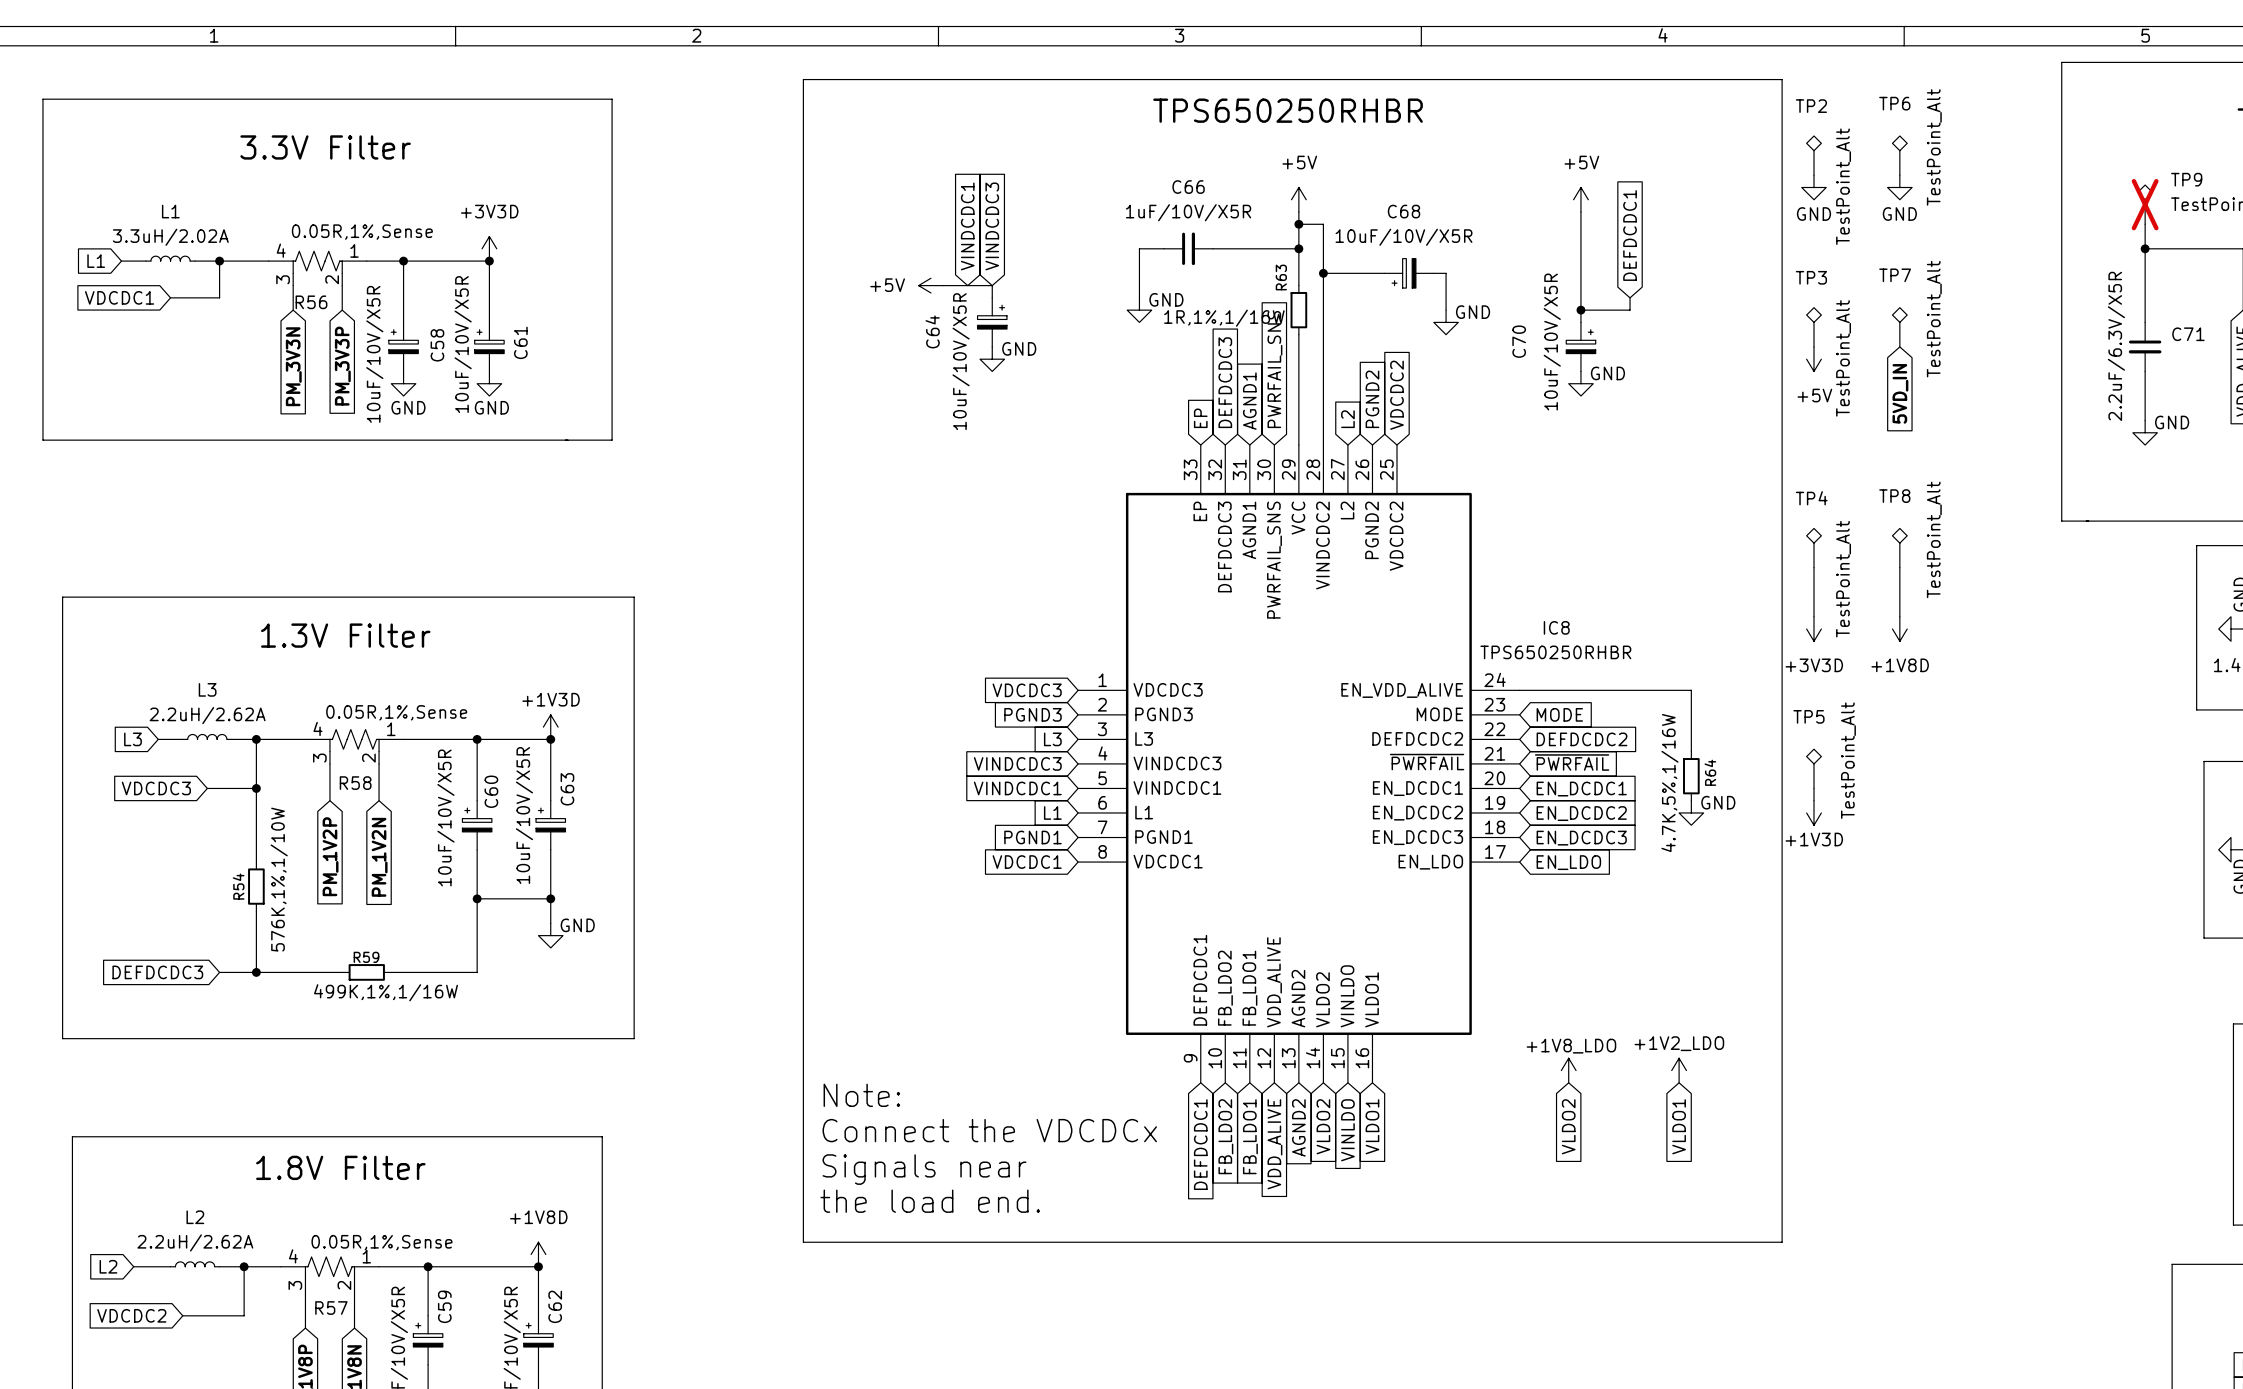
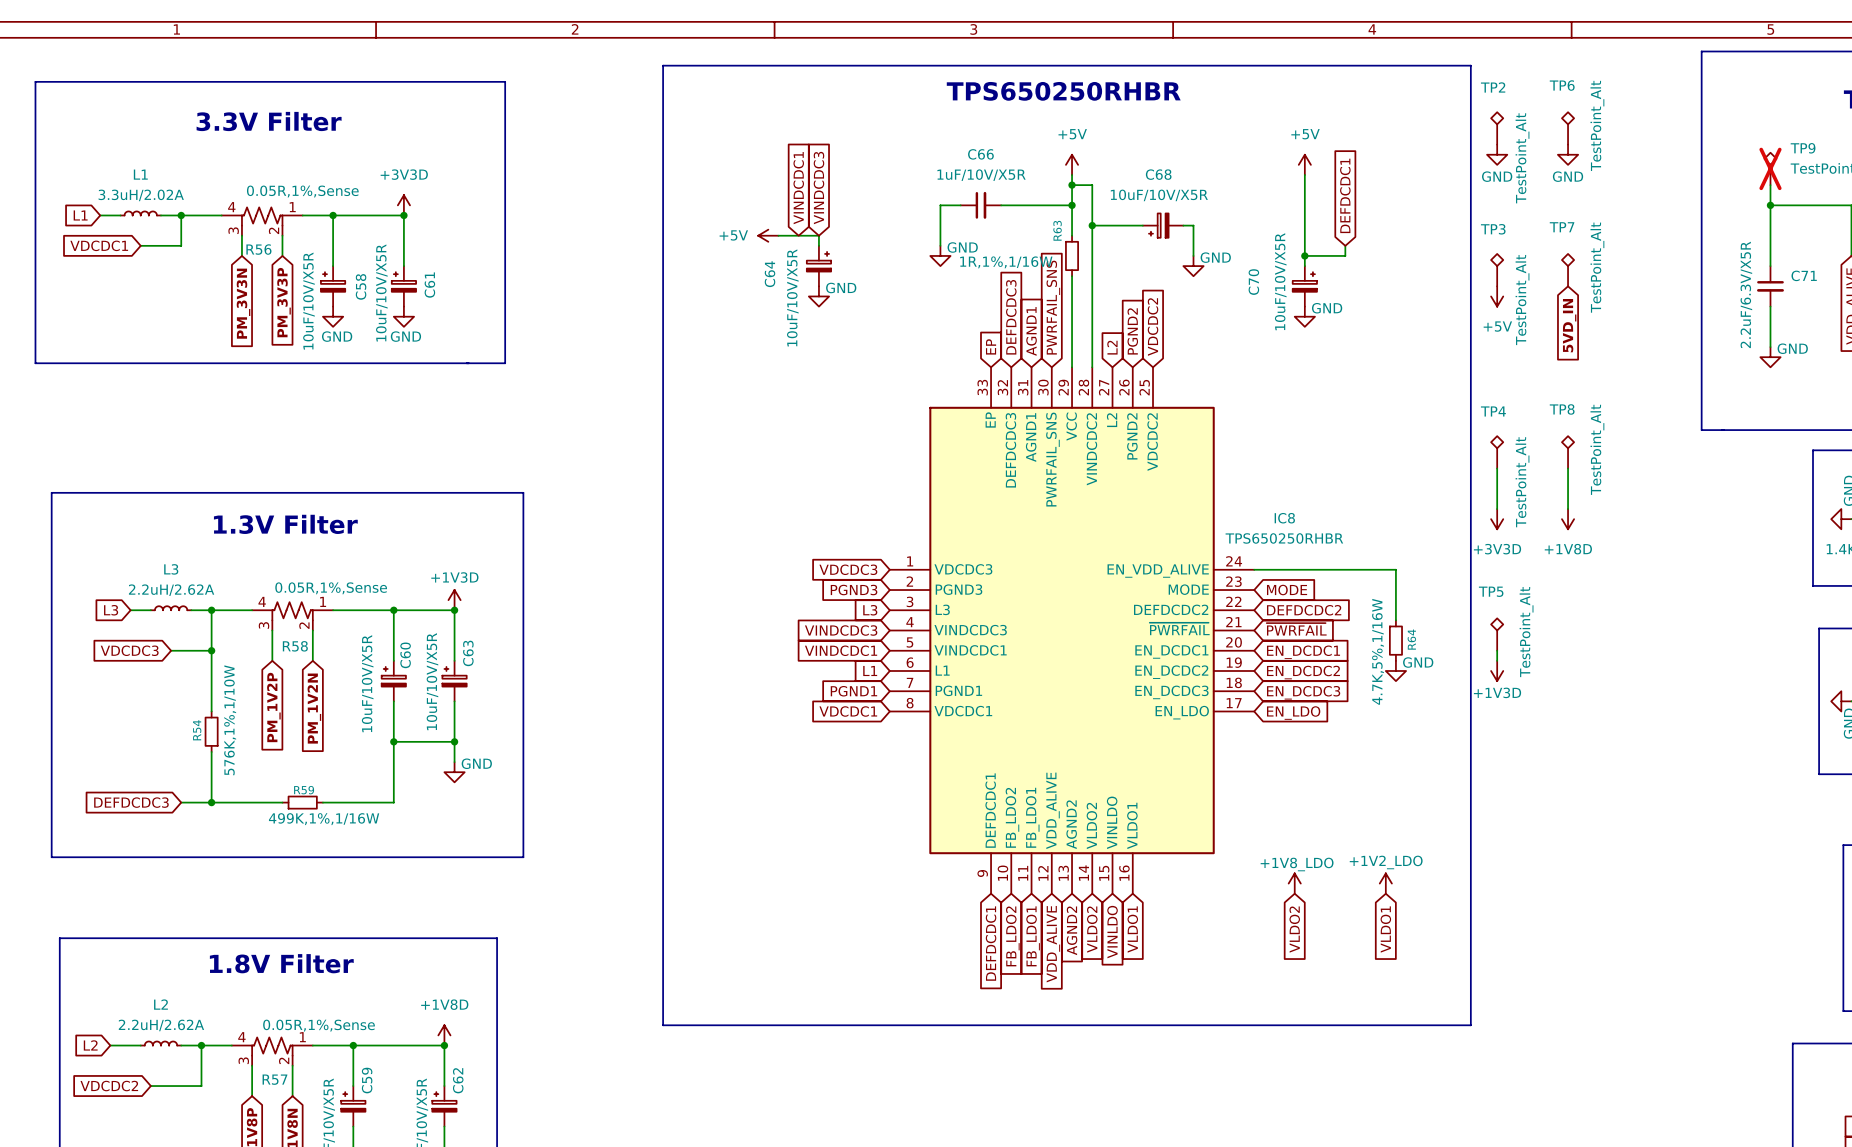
text: Note: (861, 1095) -> none
text: Connect the VDCDCx (989, 1130) -> none
text: Signals near (924, 1169) -> none
text: the load end. (930, 1201) -> none

